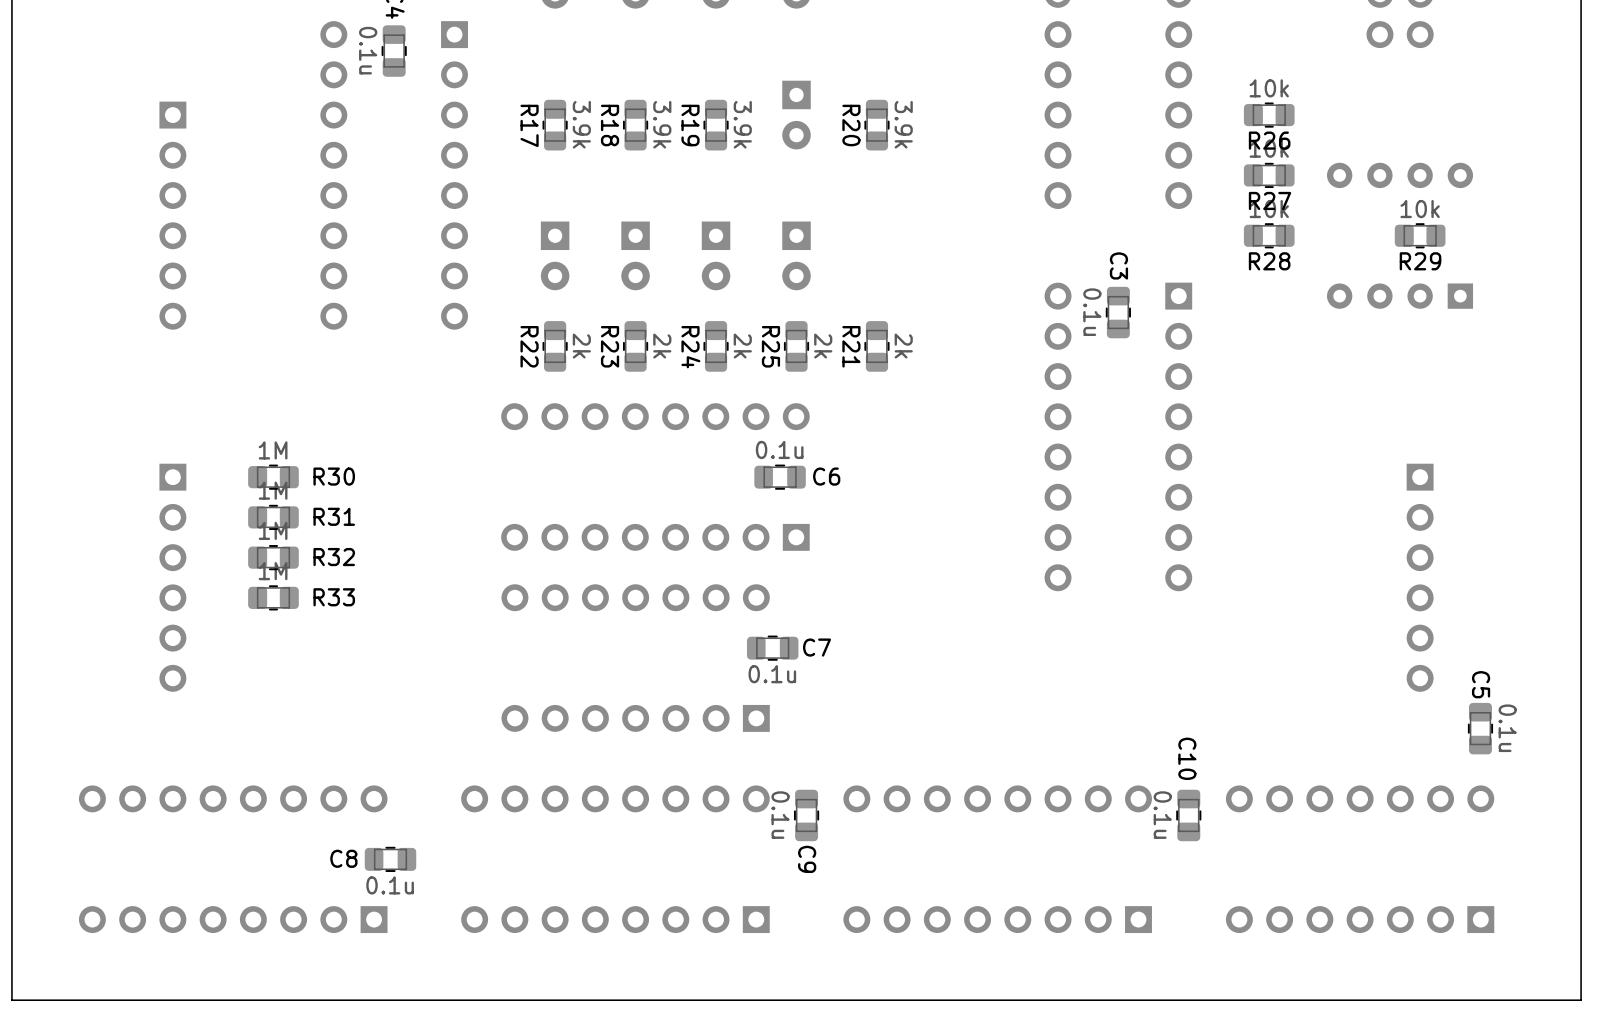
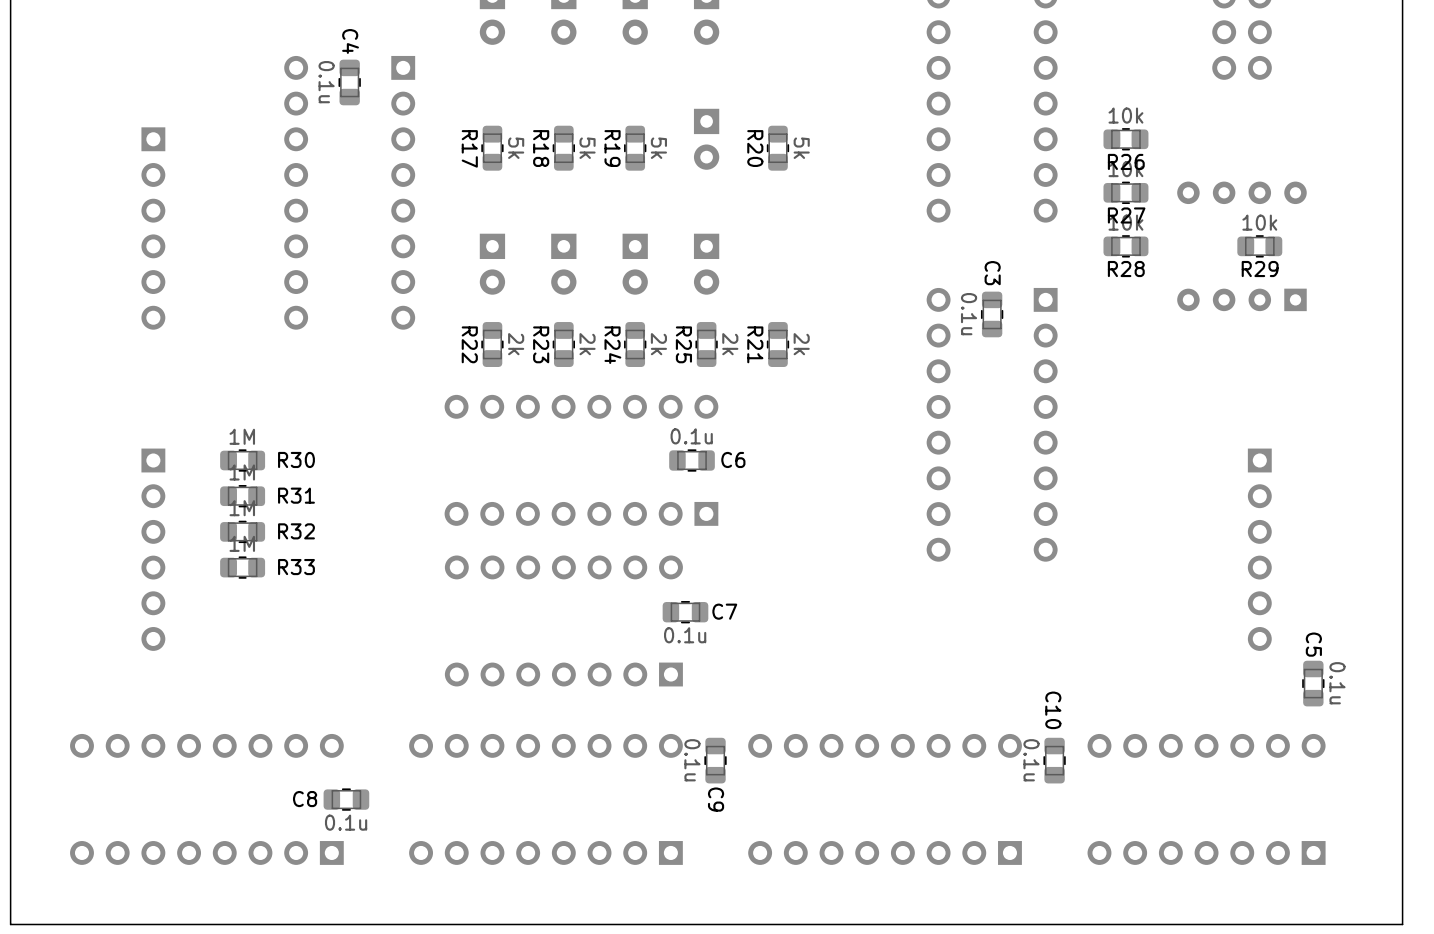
R17 value: 3.9k (581, 124) -> 5k (516, 148)
R18 value: 3.9k (662, 124) -> 5k (587, 148)
R19 value: 3.9k (742, 124) -> 5k (658, 148)
R20 value: 3.9k (903, 124) -> 5k (801, 148)

